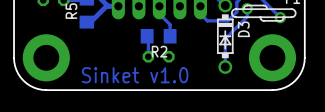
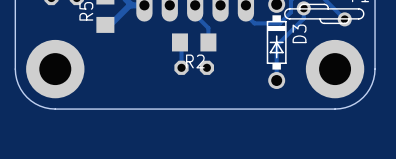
text: Sinket v1.0 (135, 75) -> none

